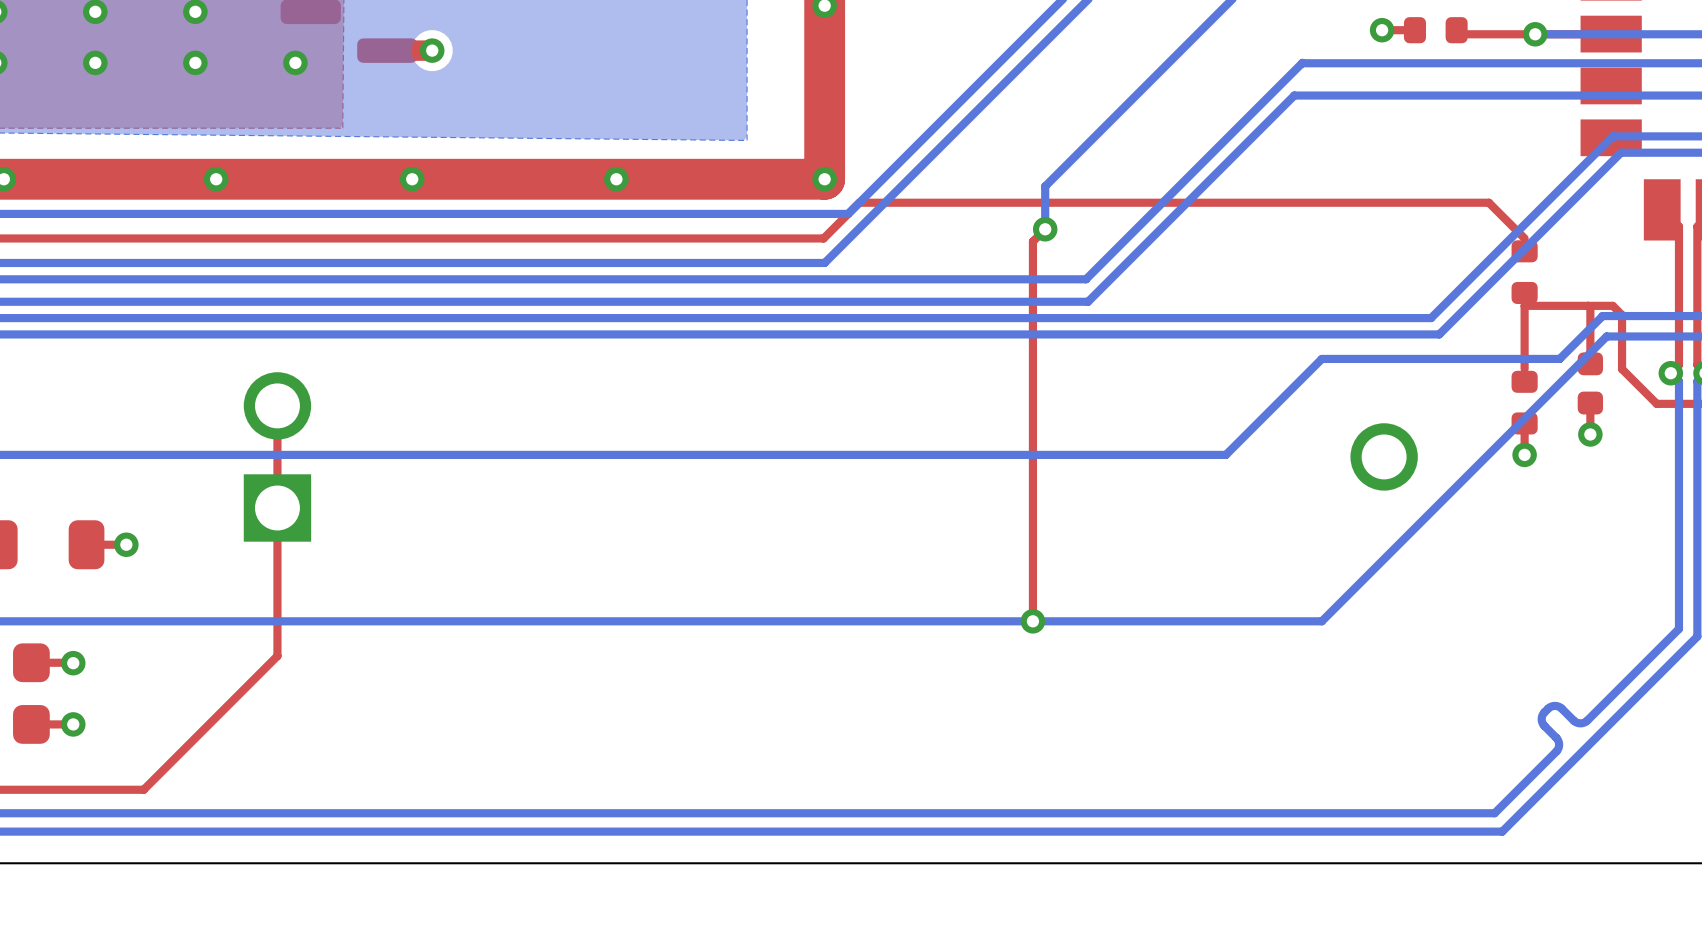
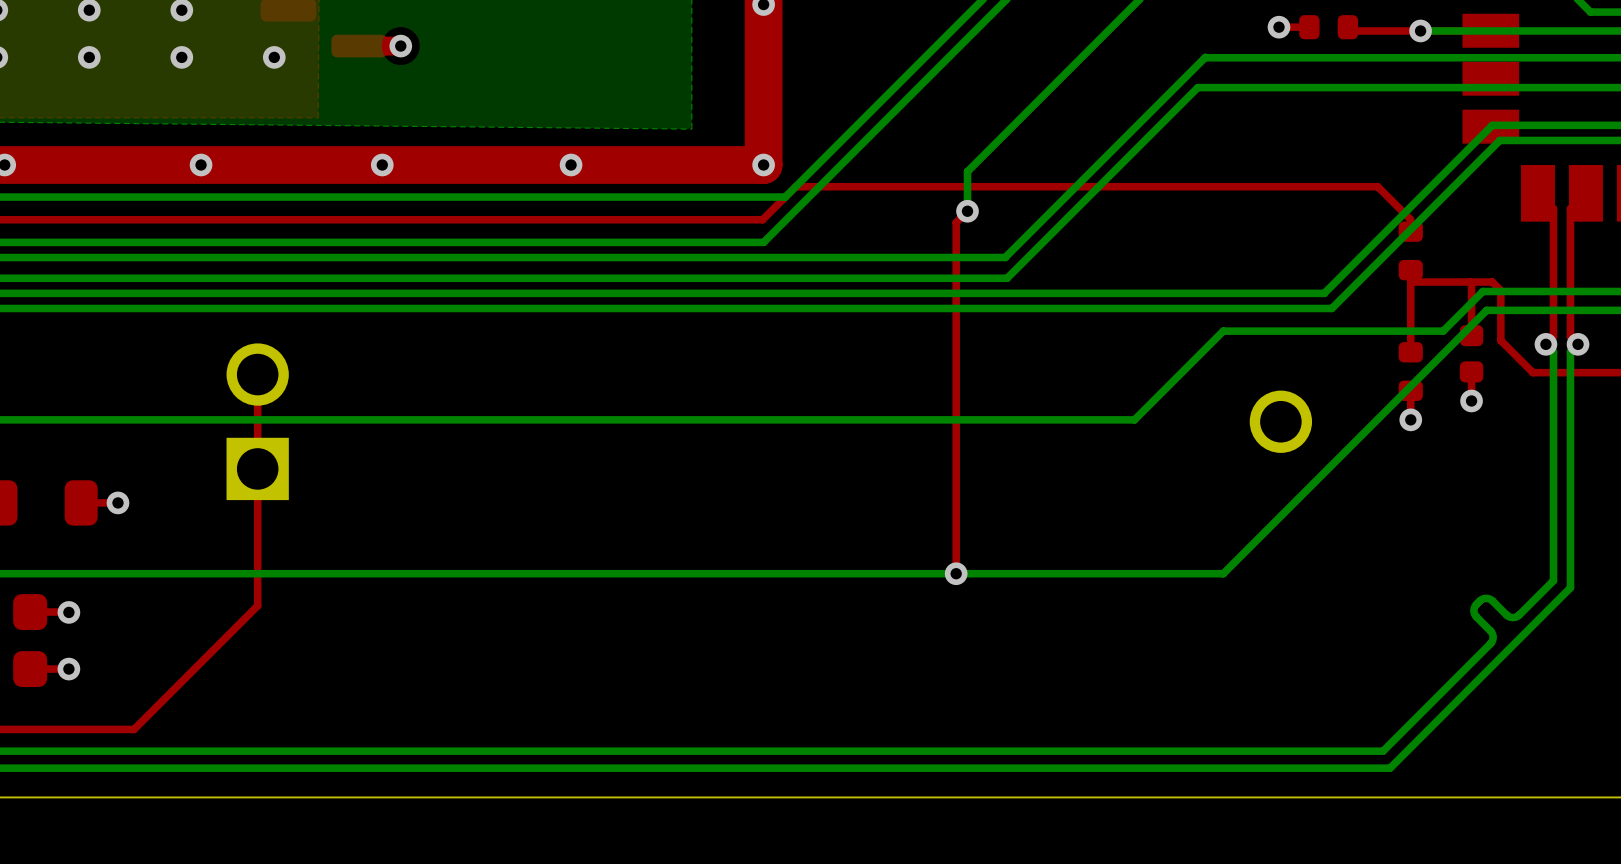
bottom track: (1642, 665) (1610, 697) -> (1519, 614) (1513, 617) (1508, 616) (1488, 598) (1482, 599) (1476, 604) (1474, 609) (1474, 614) (1492, 634) (1490, 643)
bottom track: (1587, 720) (1583, 723) (1576, 722) (1556, 706) (1550, 707) (1544, 712) (1542, 716) (1542, 722) (1558, 742) (1556, 751) -> (1468, 665) (1440, 694)

